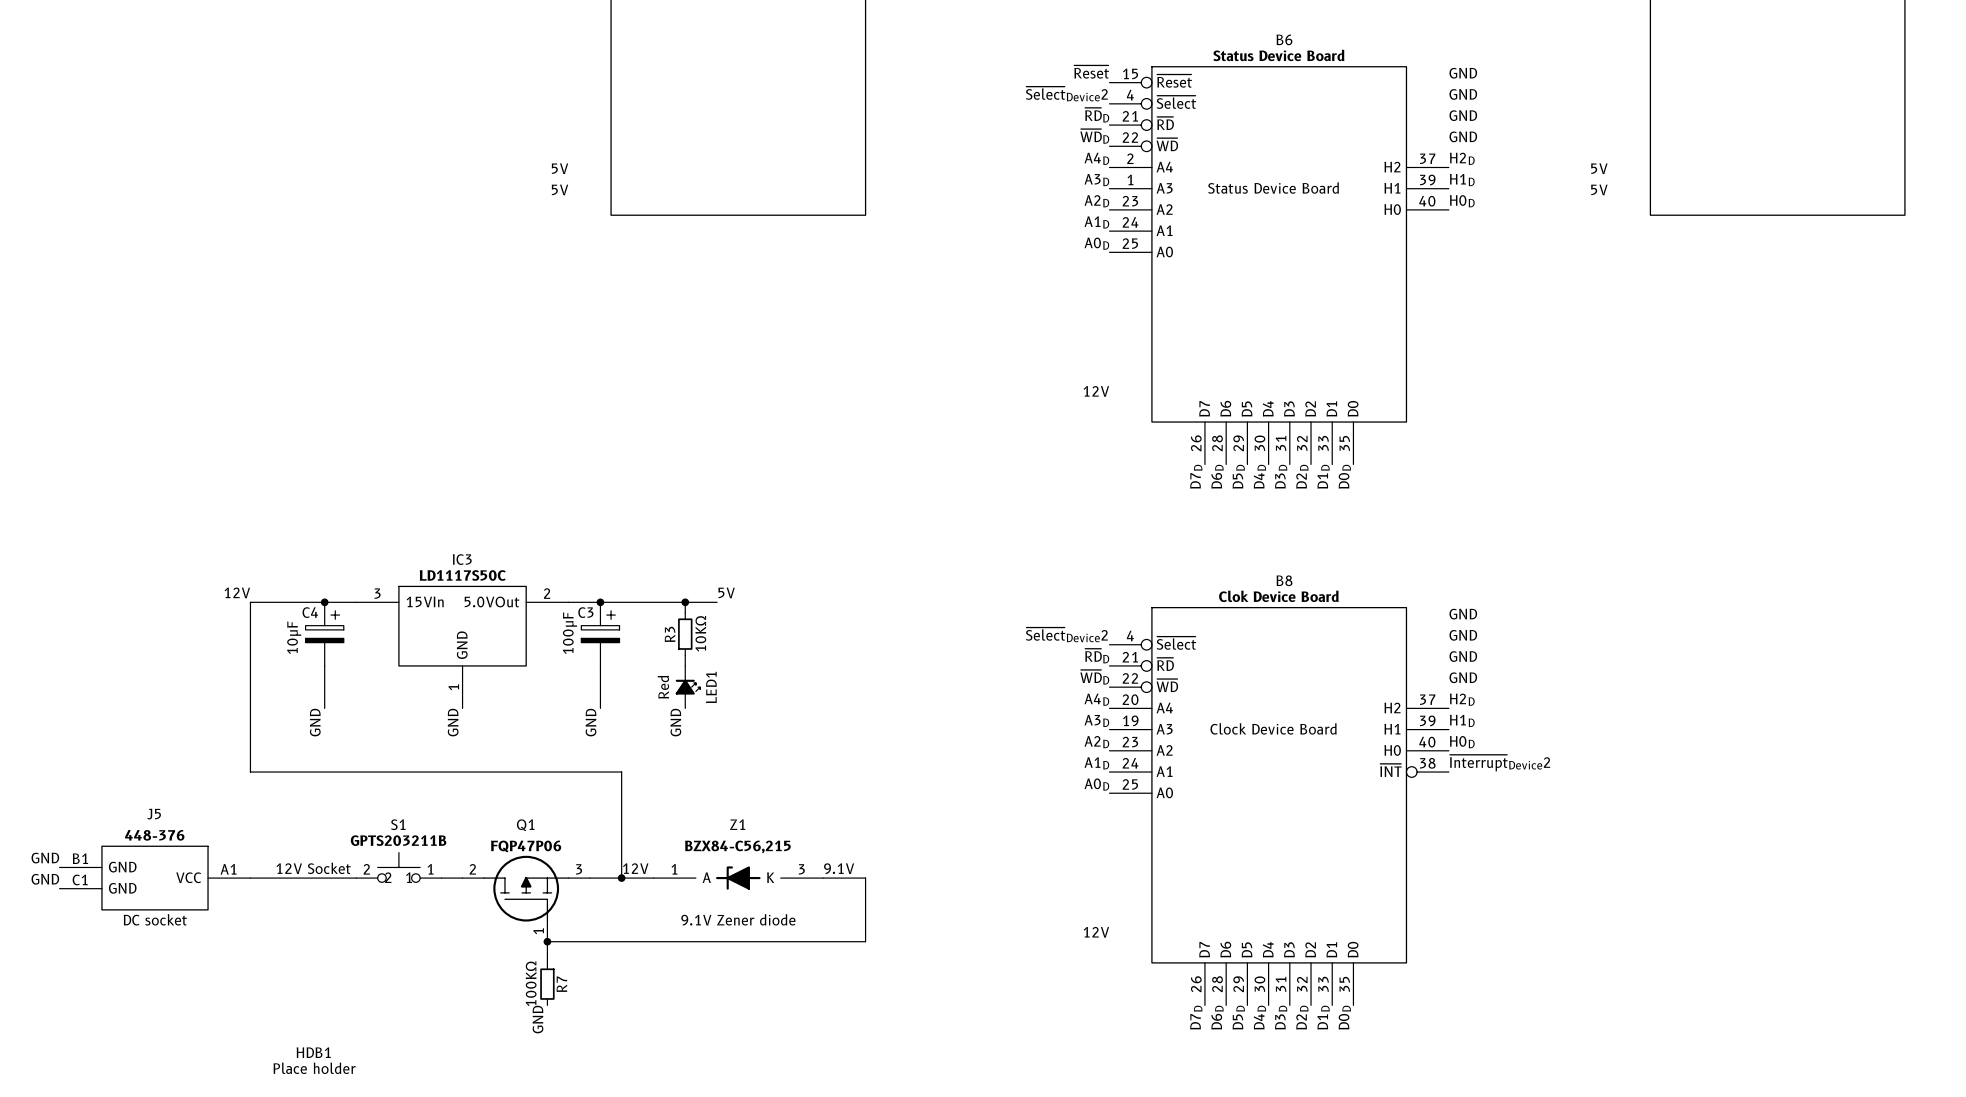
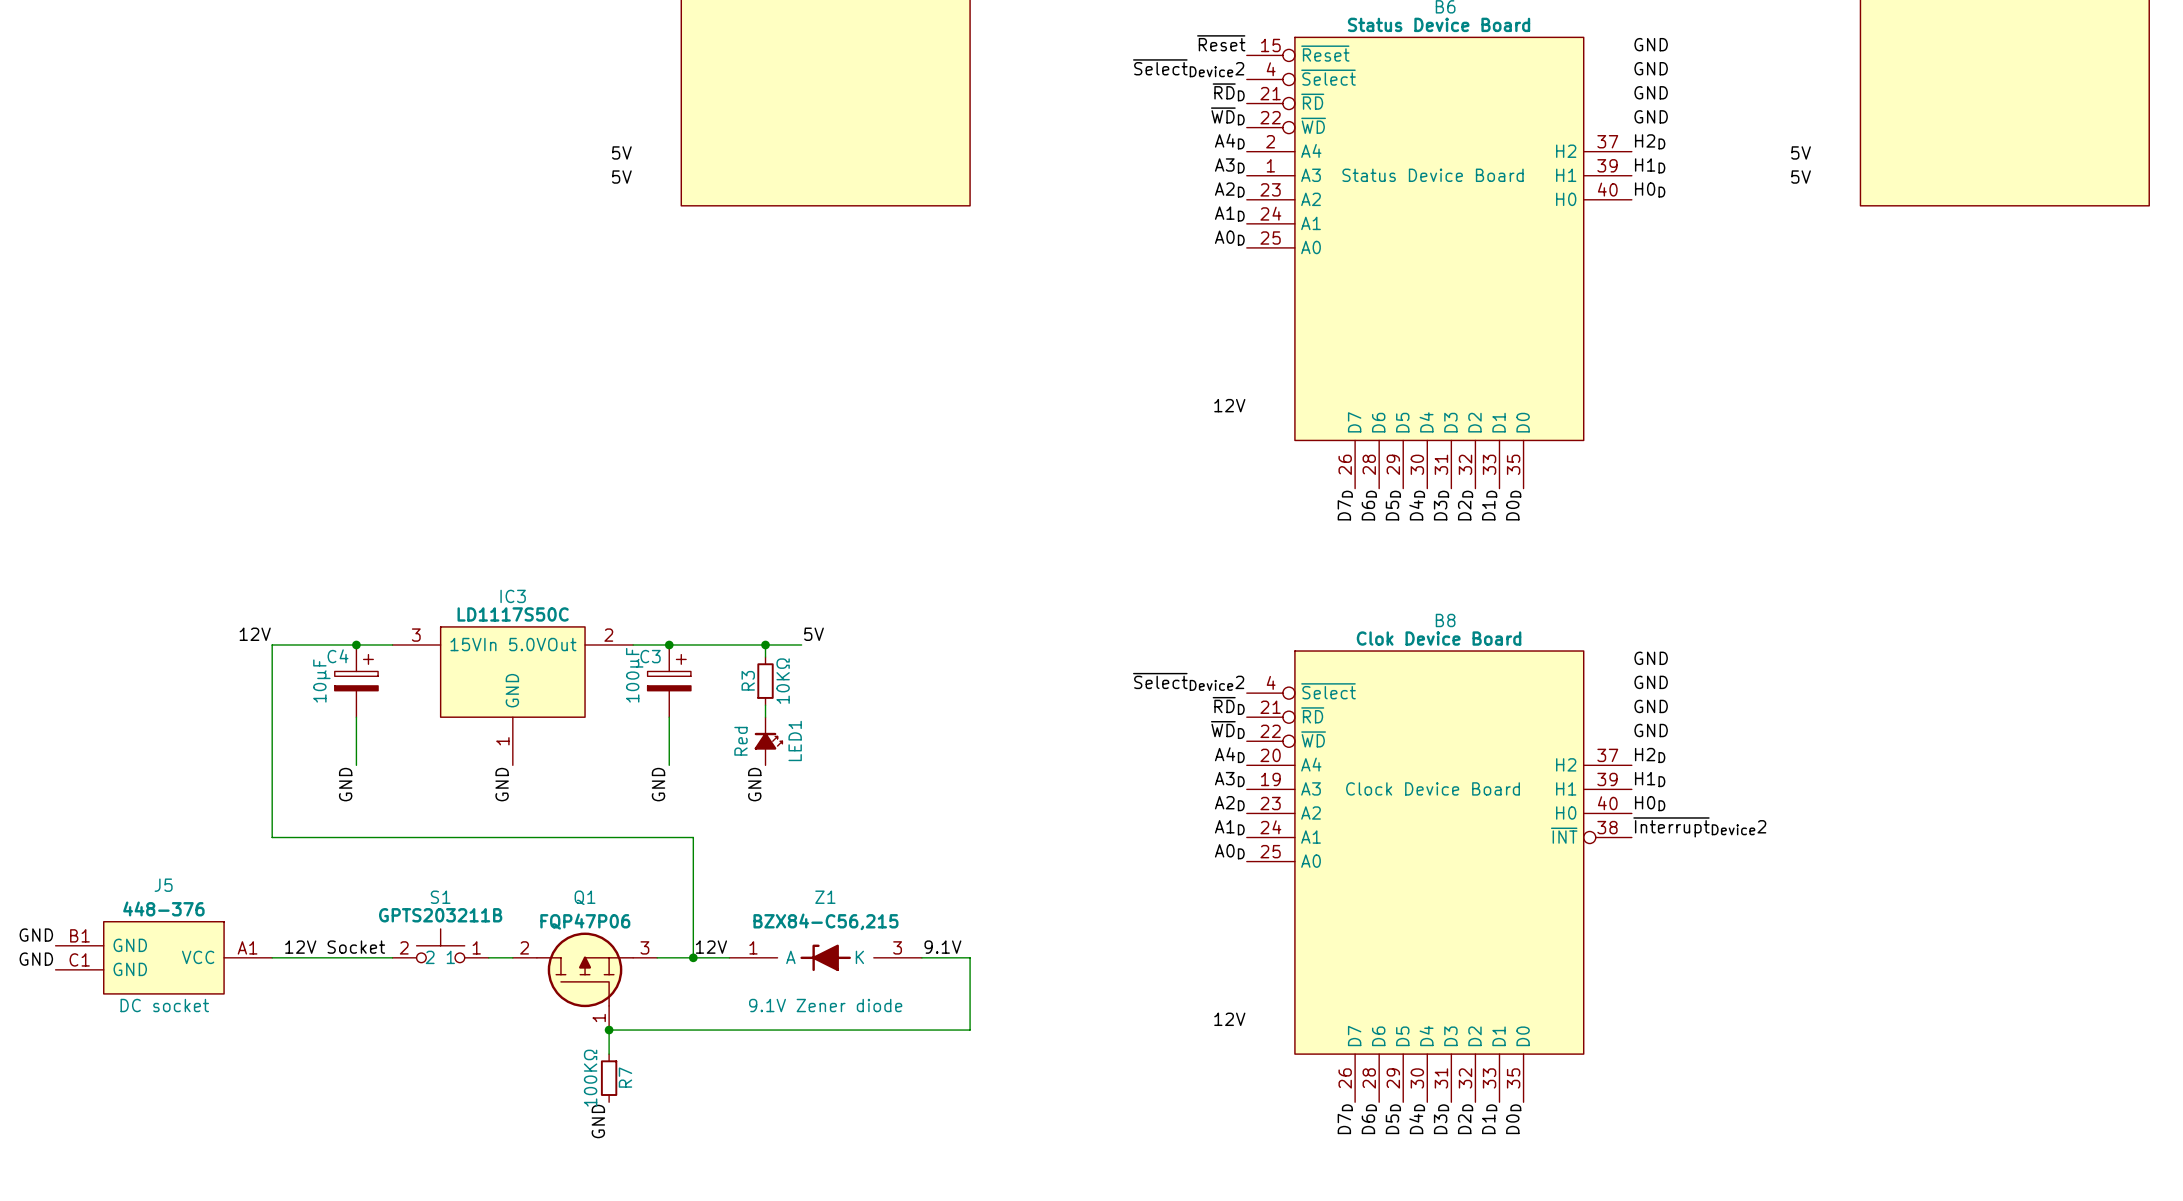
HDB1: Place holder (314, 1060) -> none

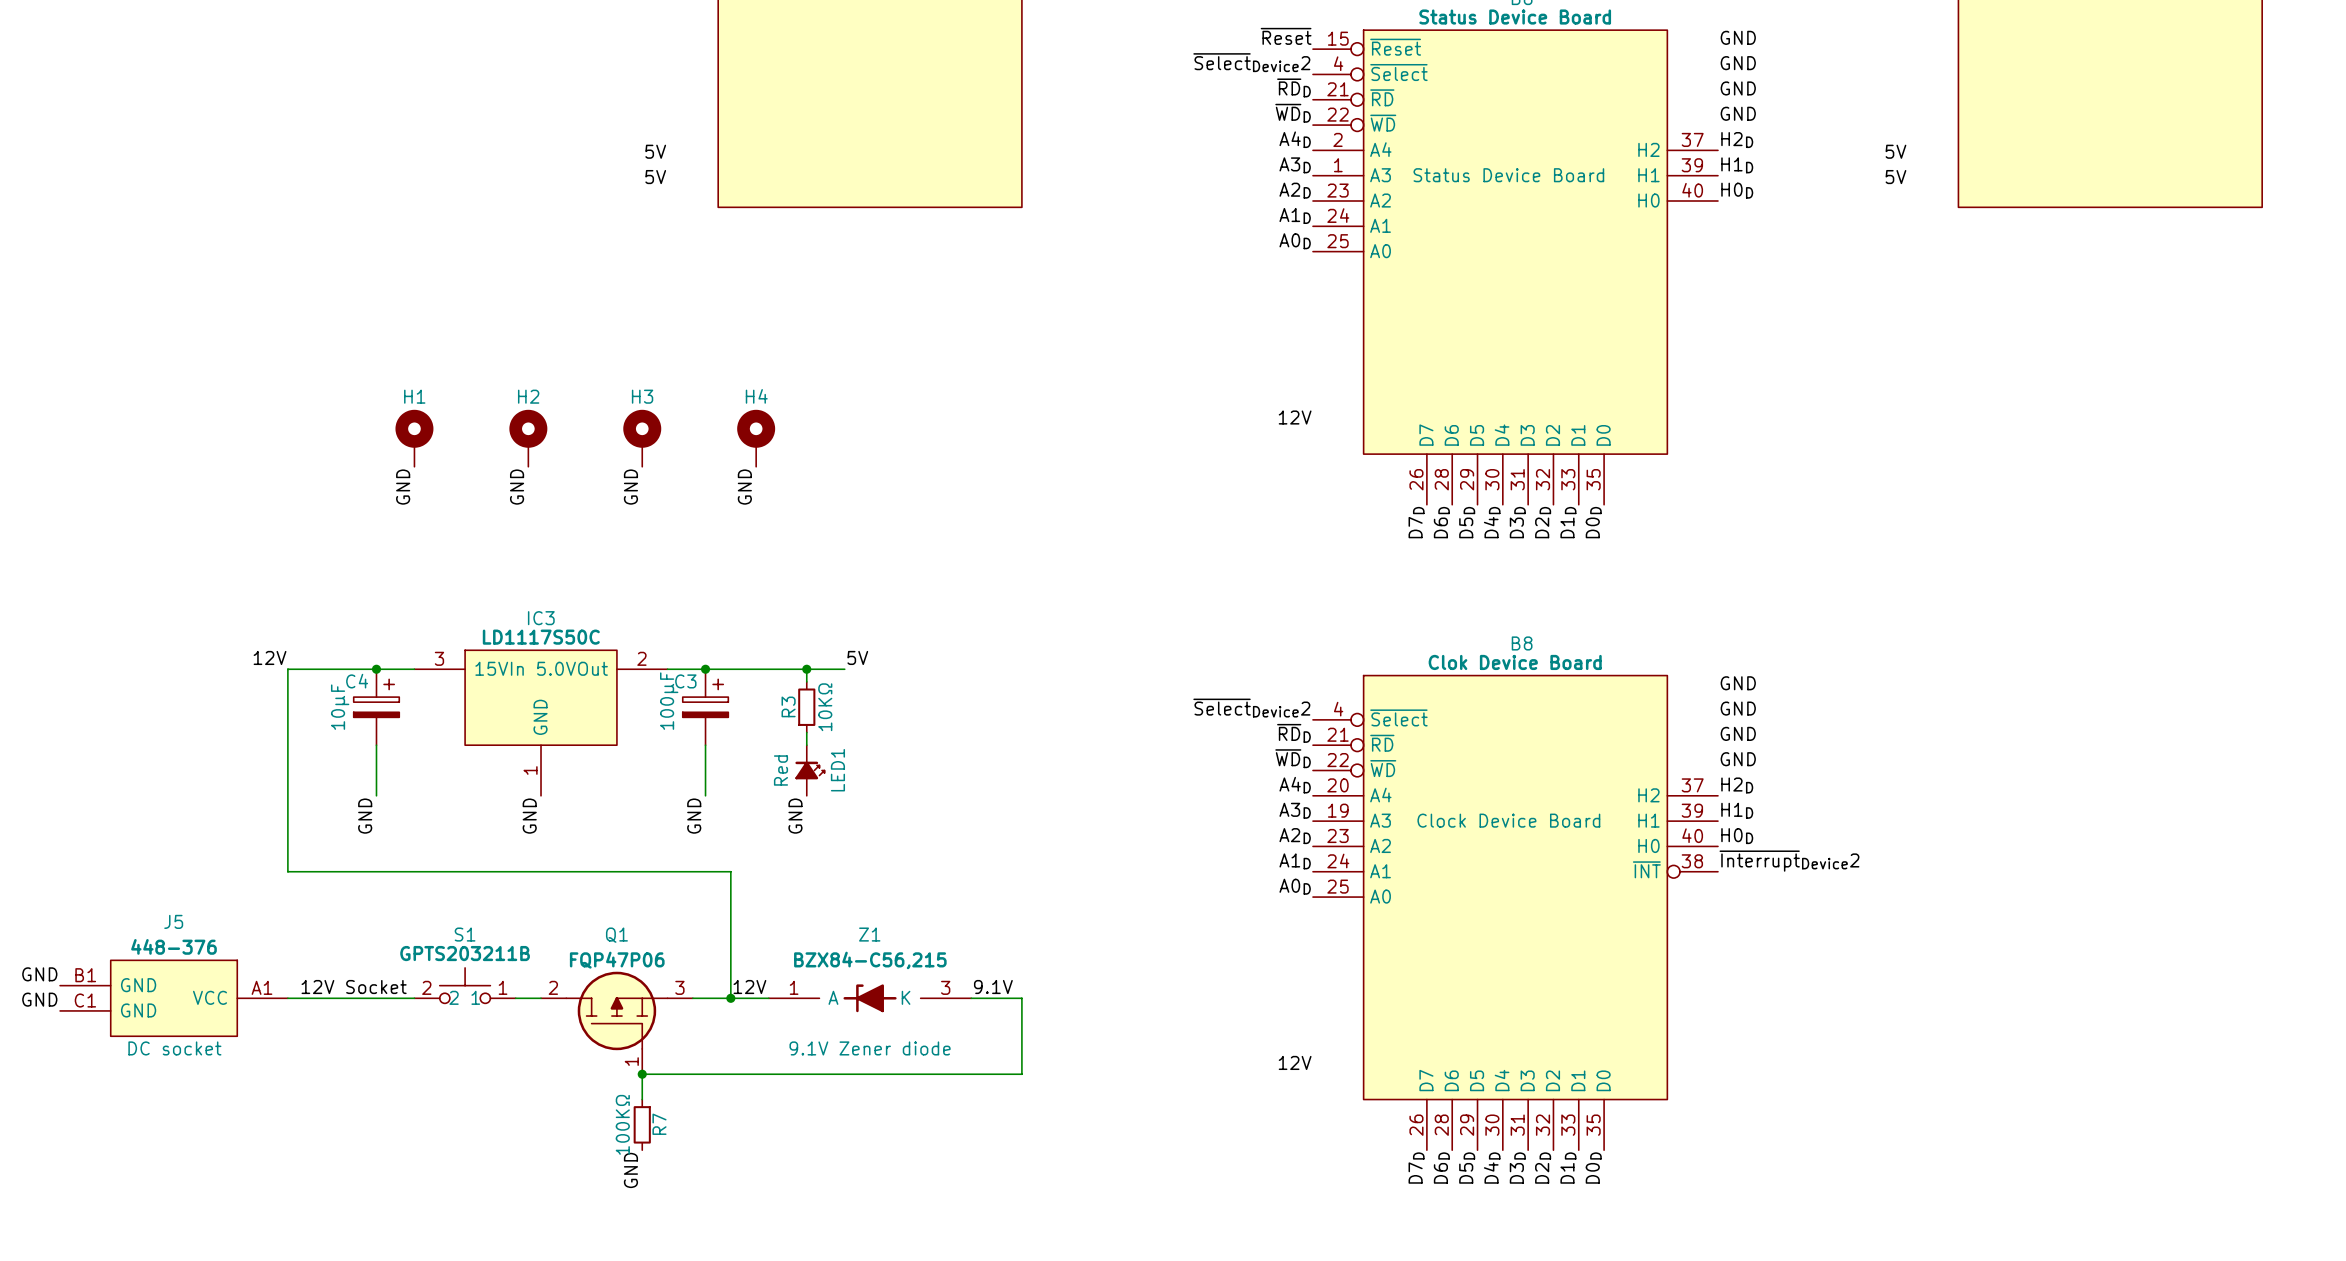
H1: none -> (414, 438)
H2: none -> (528, 438)
H3: none -> (642, 438)
H4: none -> (756, 438)
label: none -> GND (403, 487)
label: none -> GND (517, 487)
label: none -> GND (630, 487)
label: none -> GND (744, 487)

